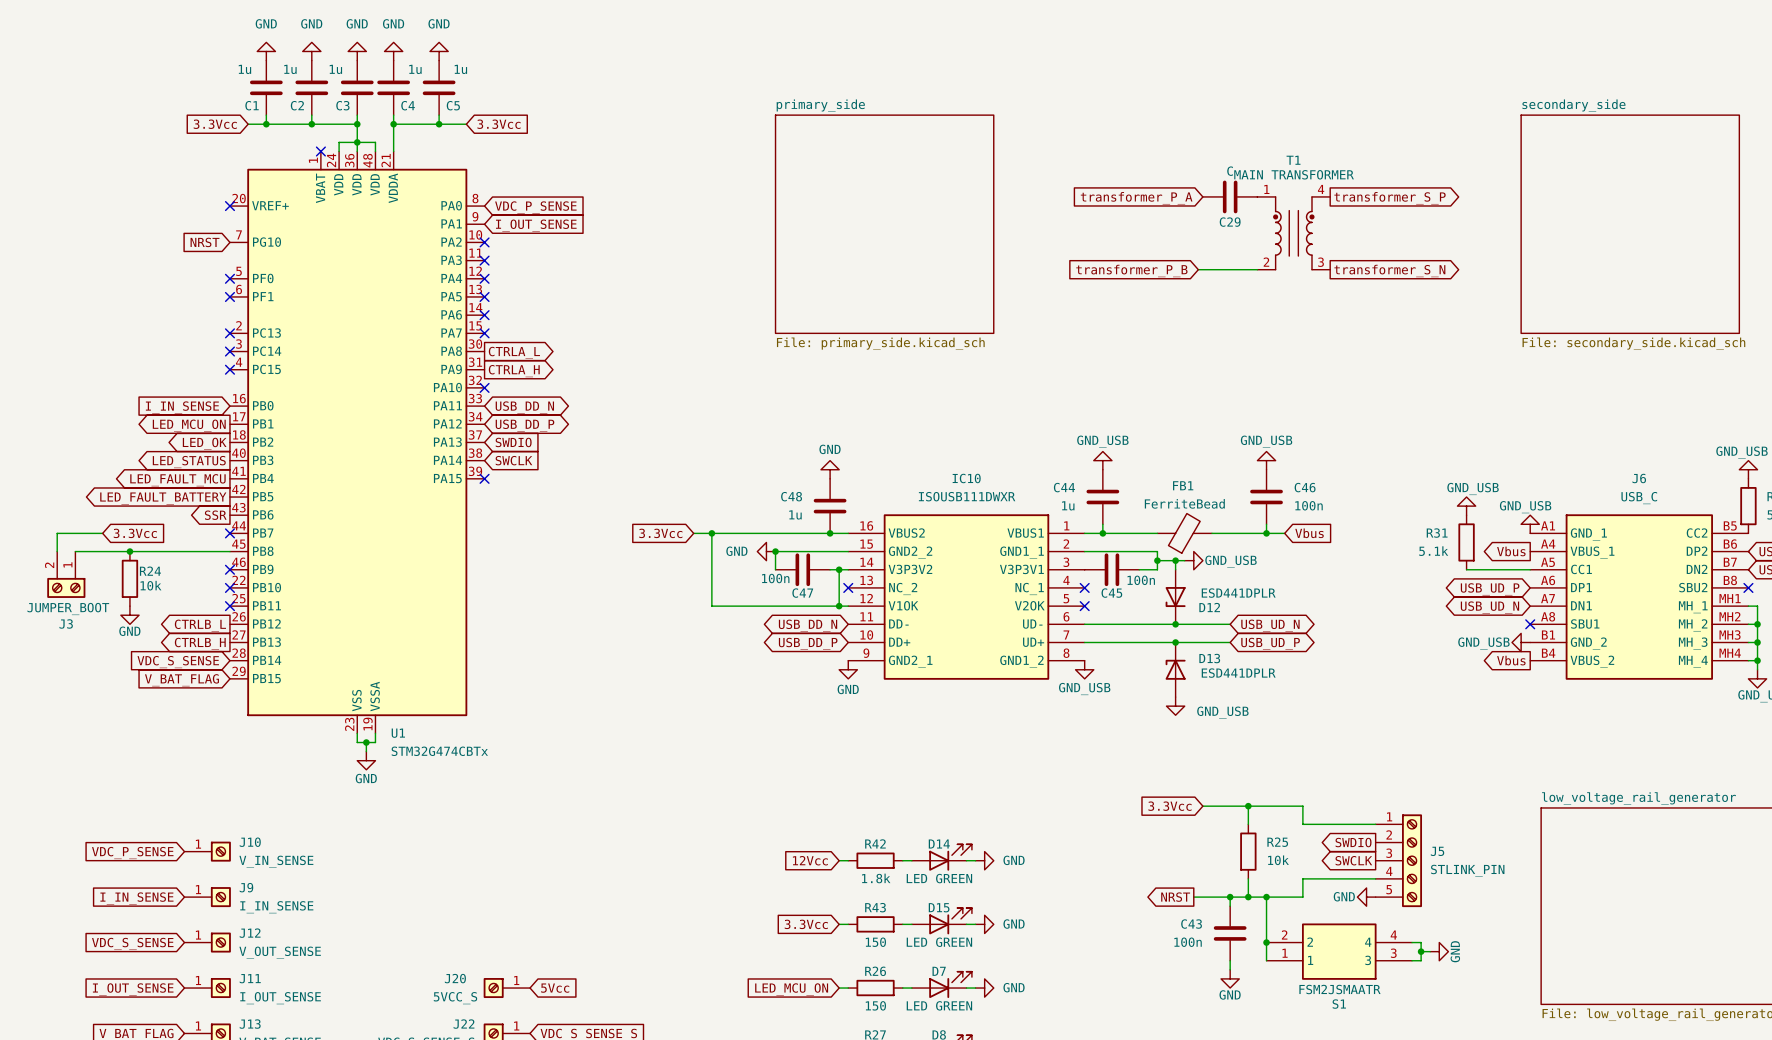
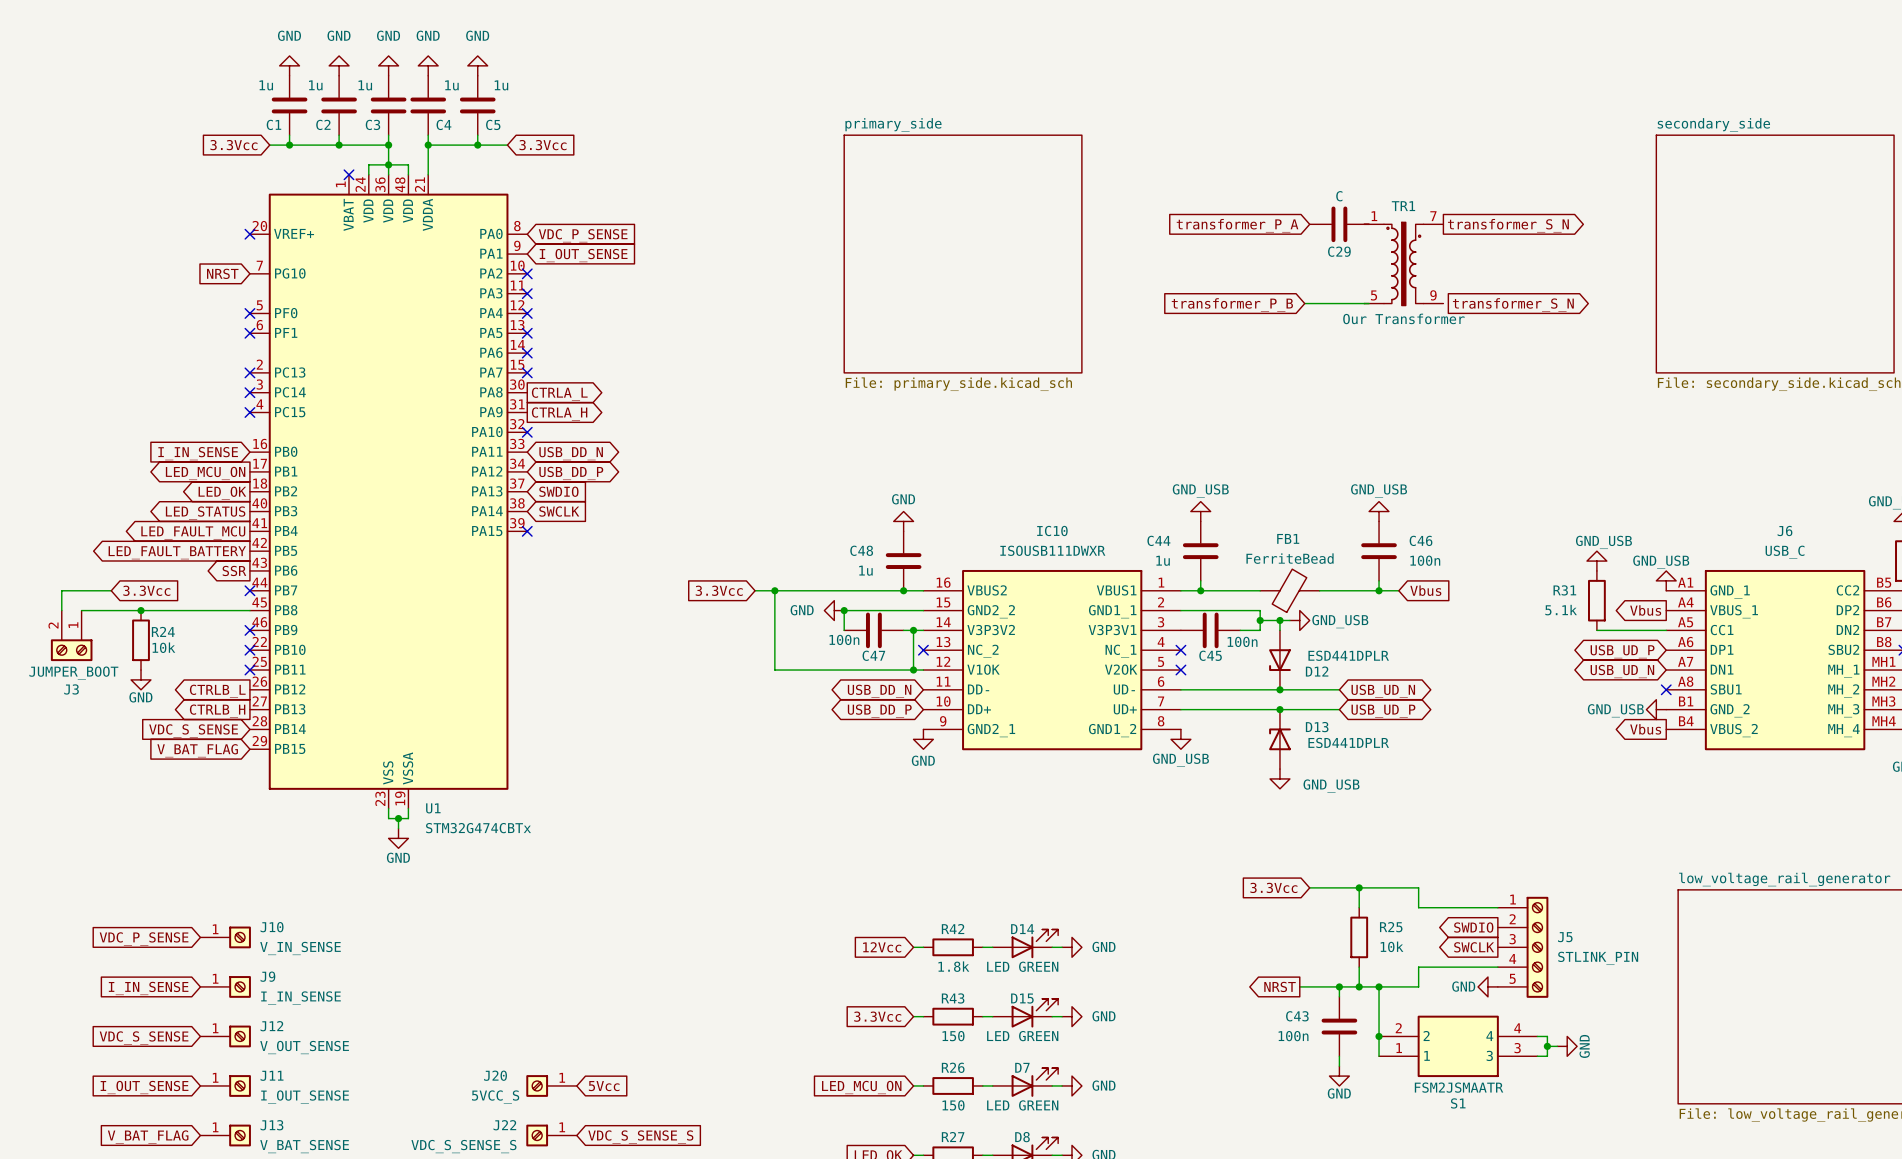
global label: transformer_S_P (1390, 198) -> transformer_S_N (1508, 225)
TR1: none -> Our Transformer (1403, 263)
T1: MAIN TRANSFORMER (1293, 233) -> none

